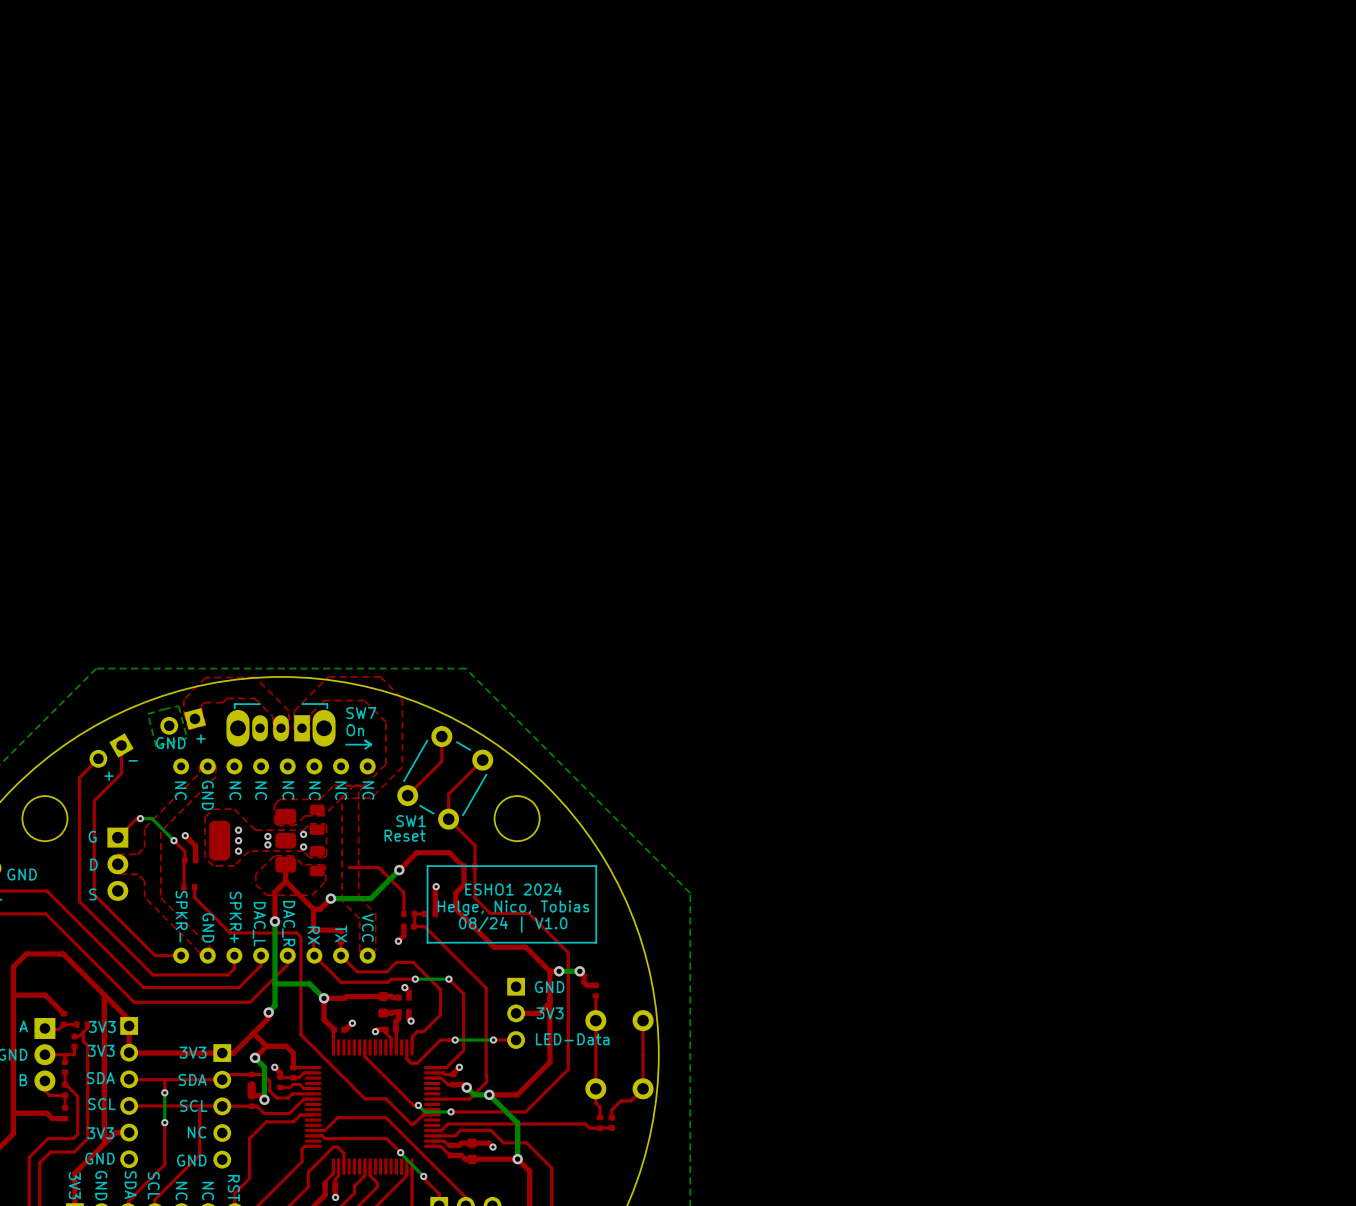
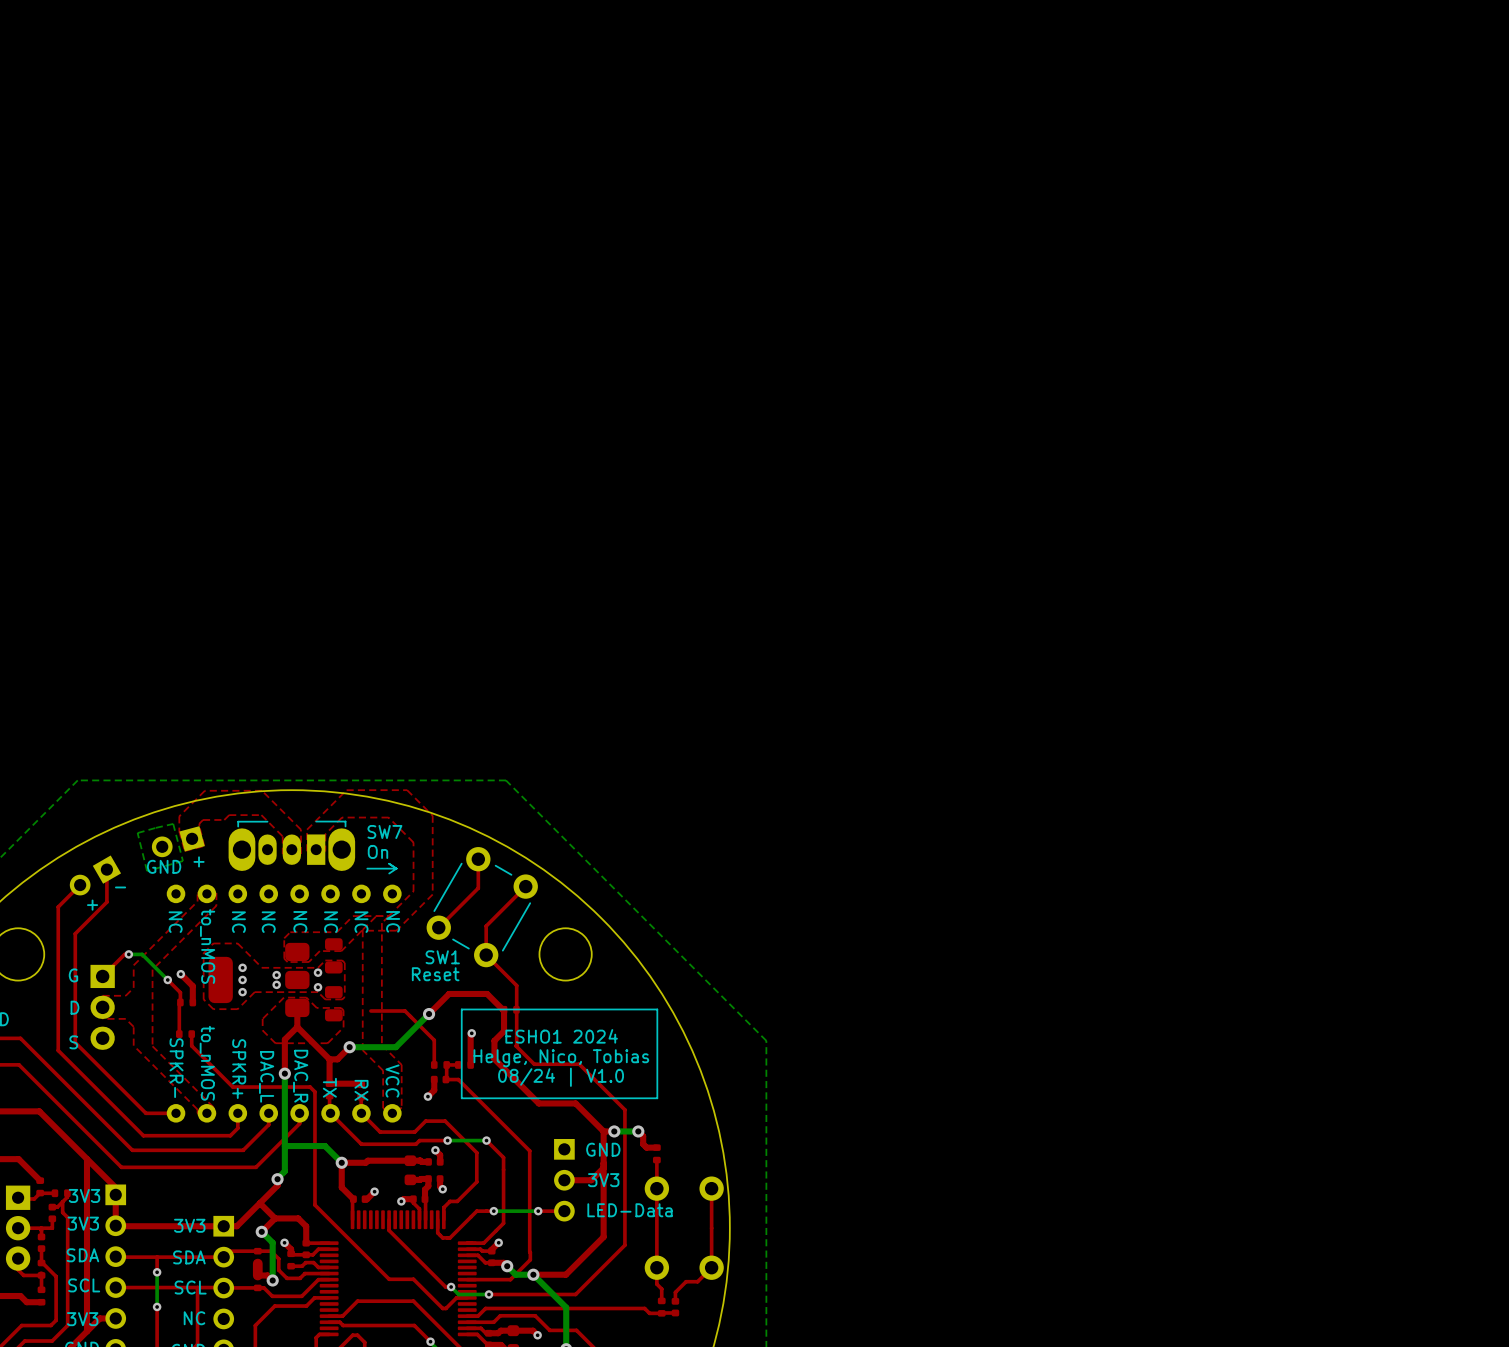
text: GND (207, 795) -> to_nMOS (207, 946)
text: none -> to_nMOS (207, 1063)
text: GND (208, 928) -> none
text: TX (341, 933) -> RX (361, 1090)
text: RX (313, 935) -> TX (329, 1087)

